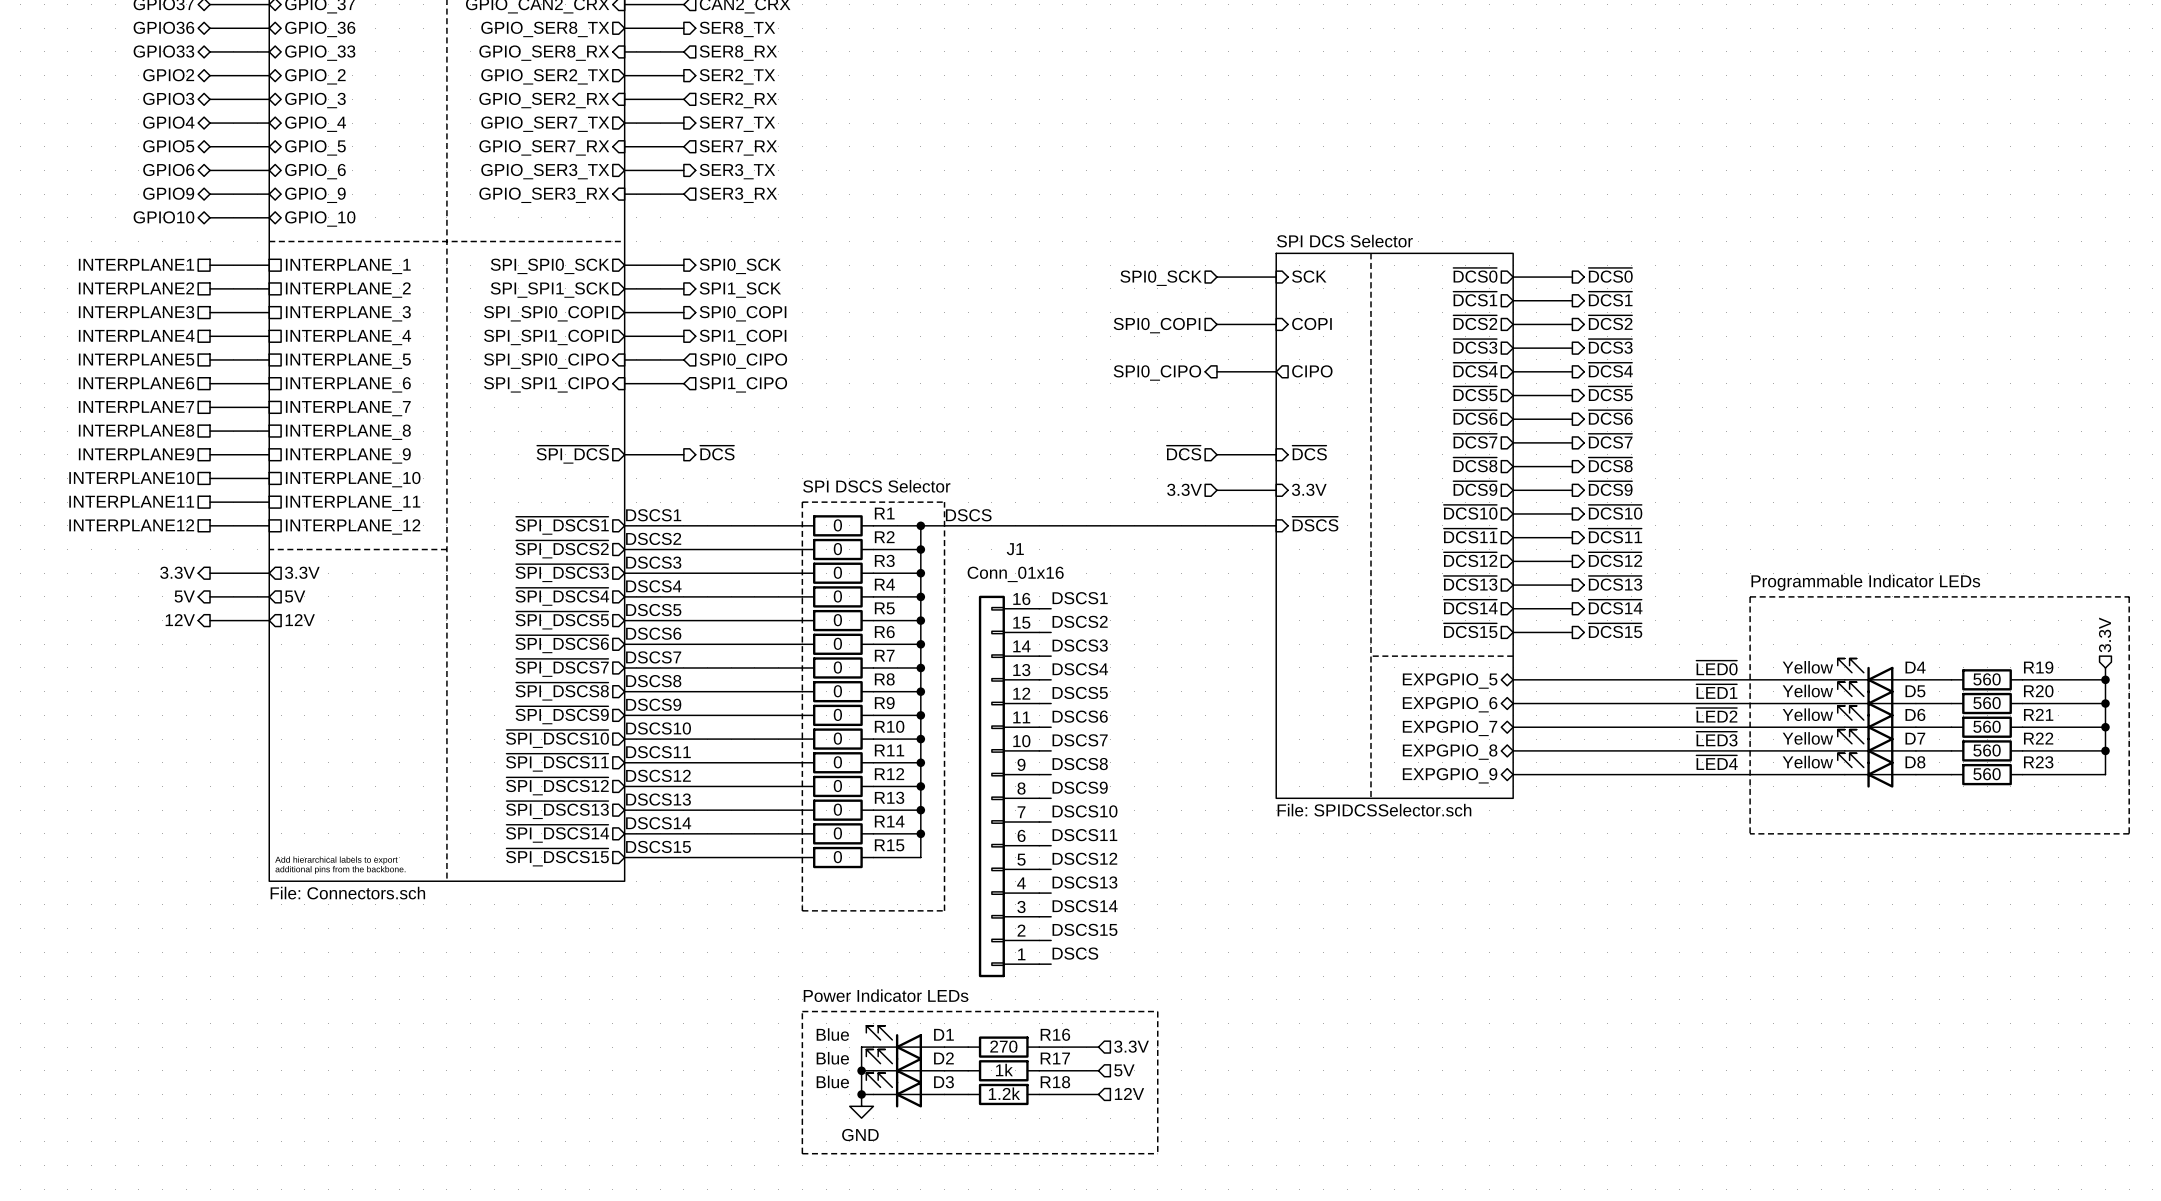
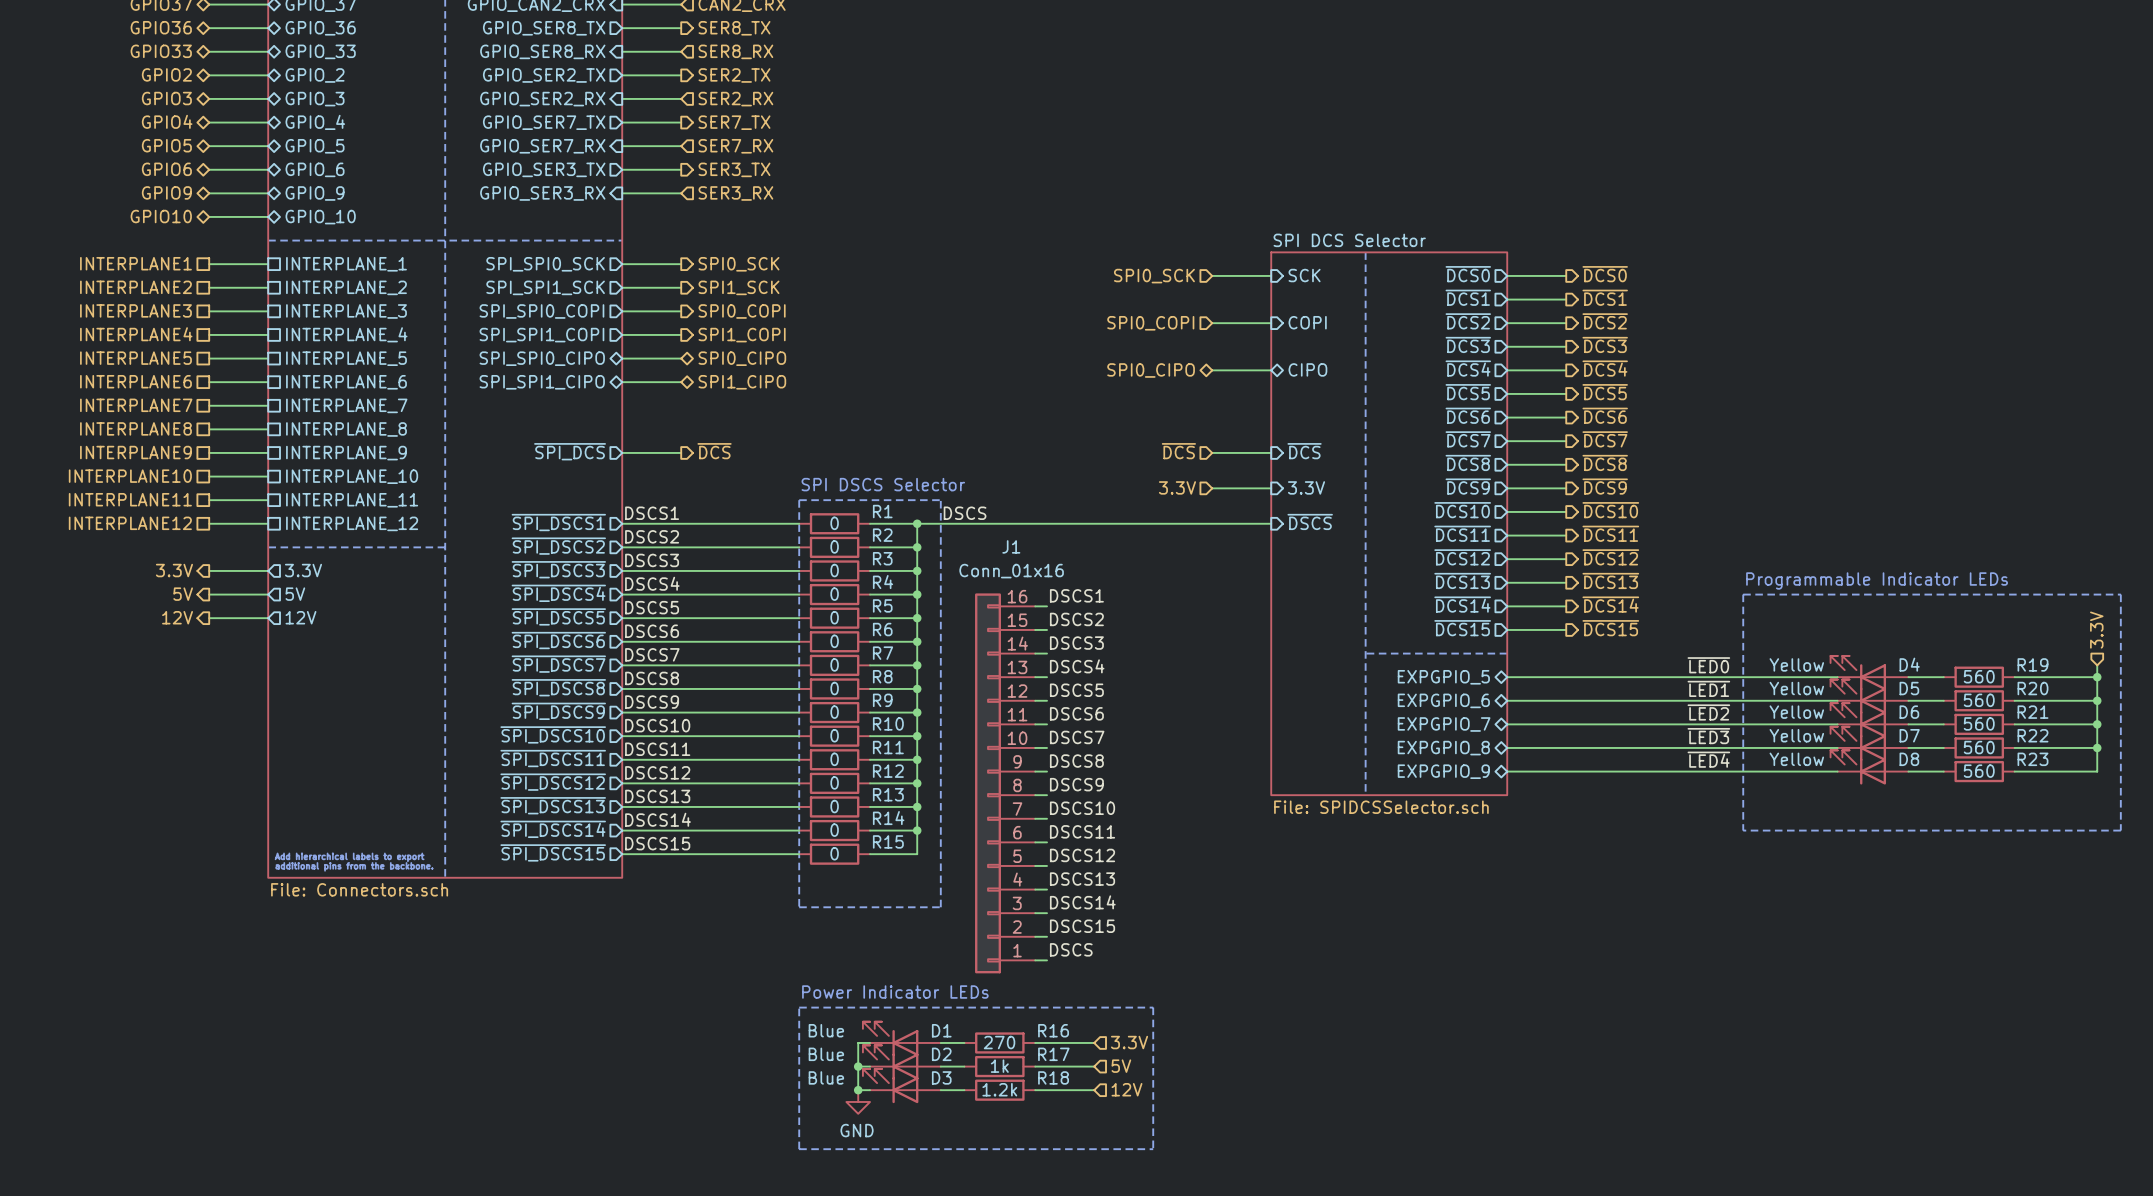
sheet pin shape: input (546, 361) -> bidirectional (542, 358)
hierarchical label shape: input (743, 361) -> bidirectional (742, 358)
sheet pin shape: output (1312, 371) -> bidirectional (1307, 369)
hierarchical label shape: output (1157, 373) -> bidirectional (1151, 370)
sheet pin shape: input (546, 384) -> bidirectional (542, 382)
hierarchical label shape: input (743, 384) -> bidirectional (742, 382)

